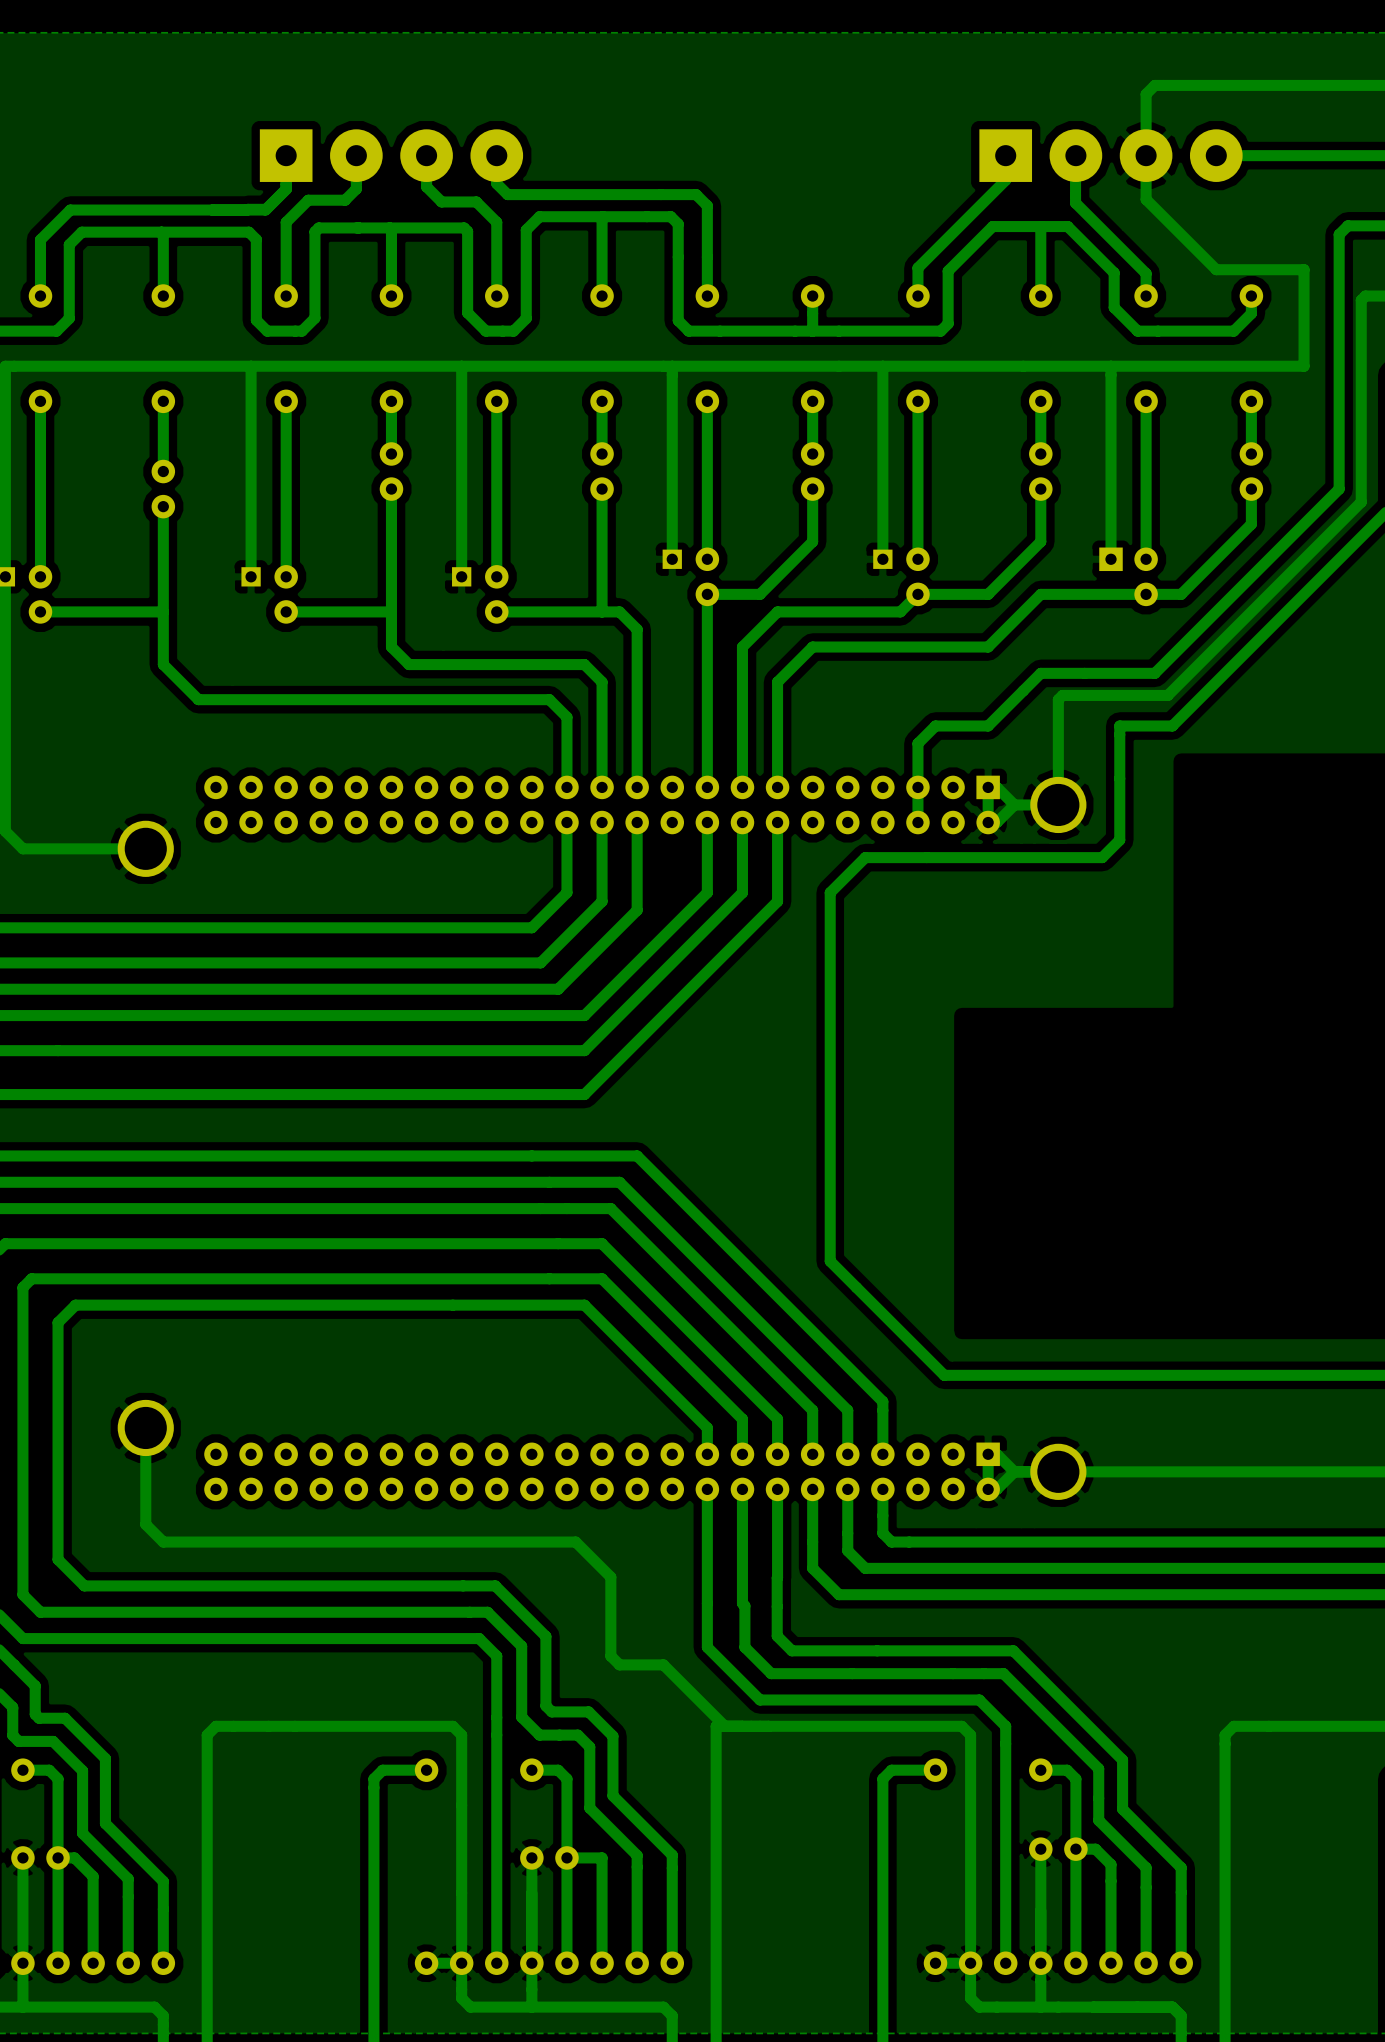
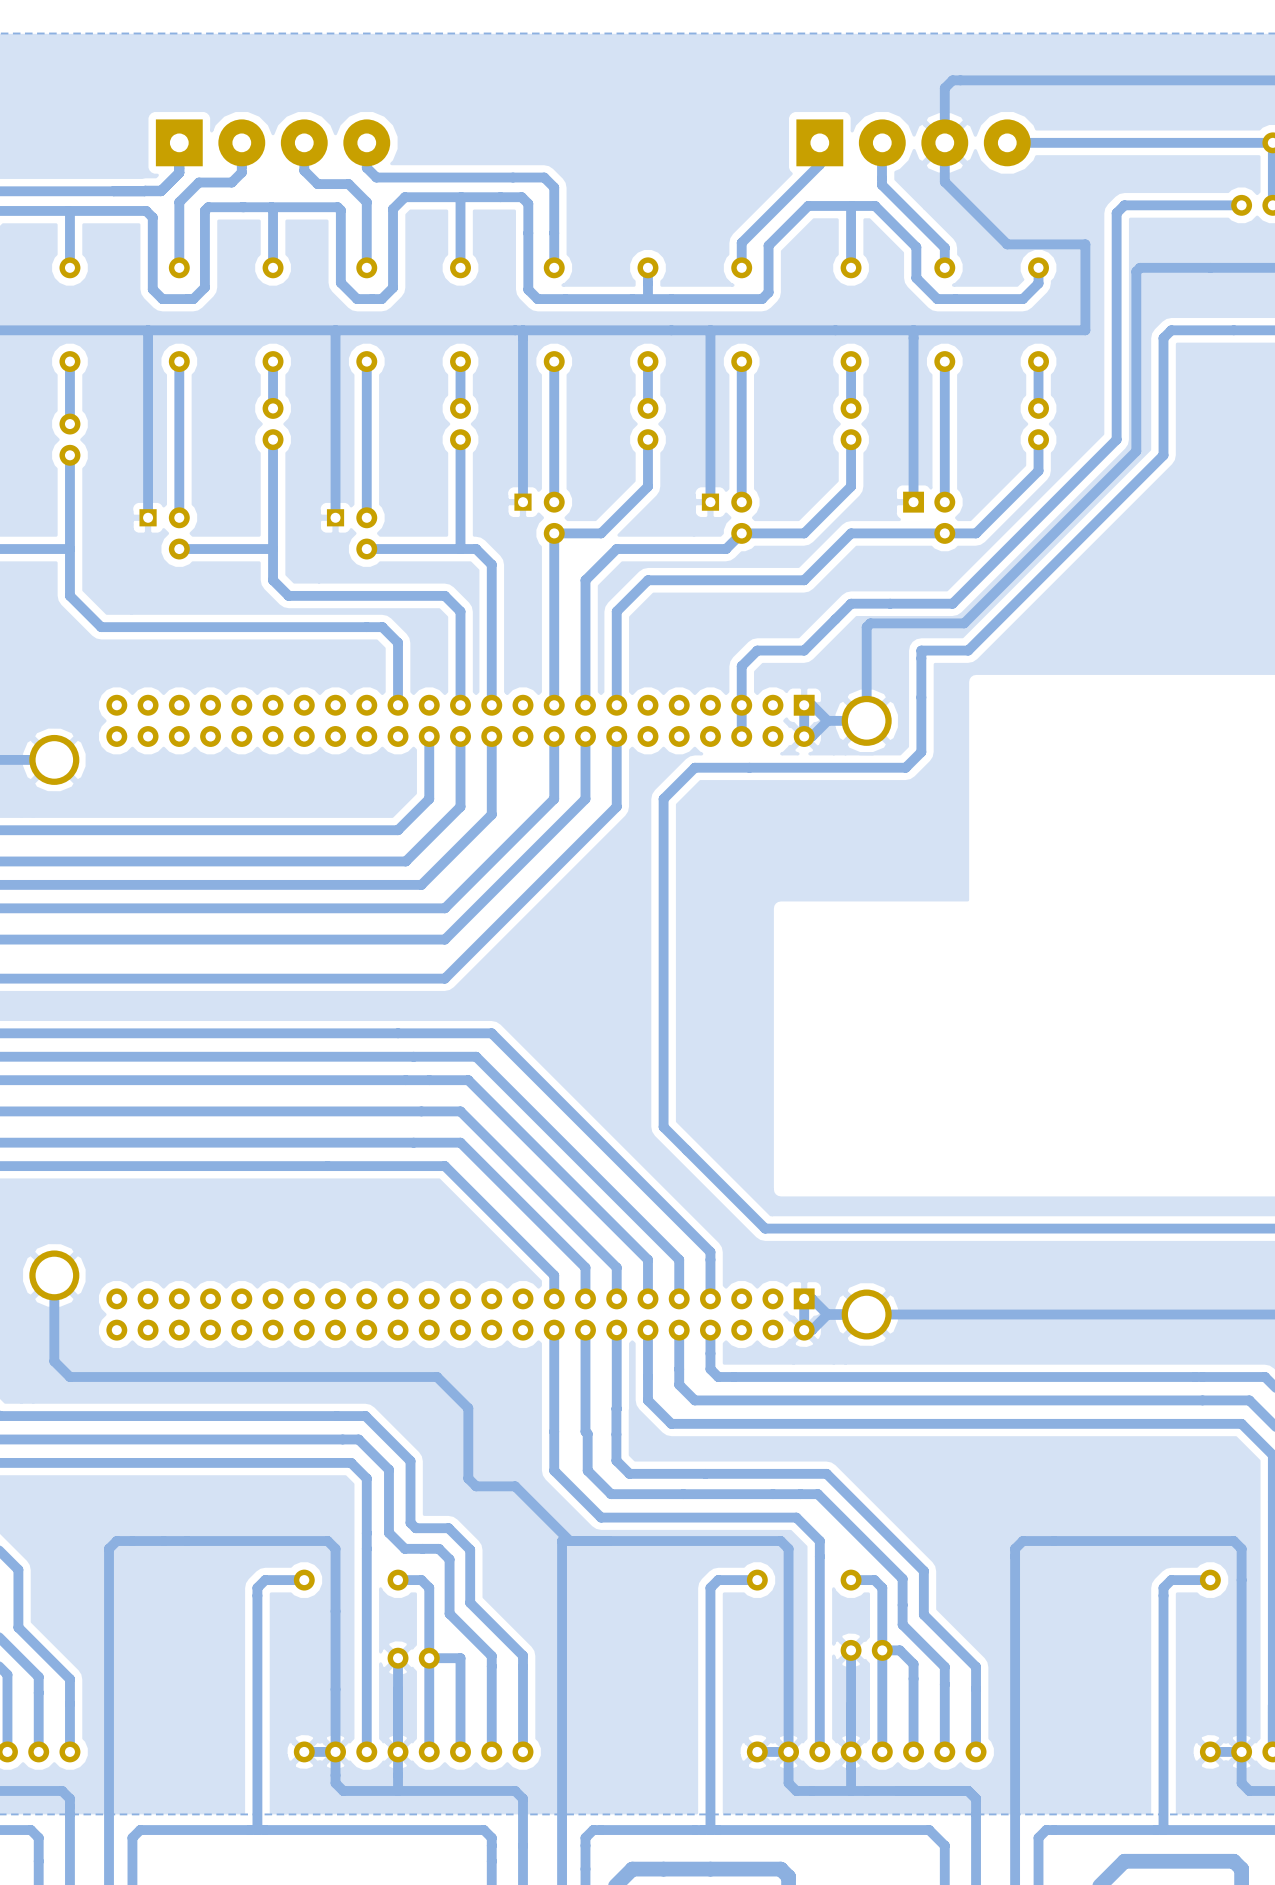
track: (514, 699) (549, 699) (566, 717) (566, 787) -> (382, 627) (398, 642) (398, 705)

